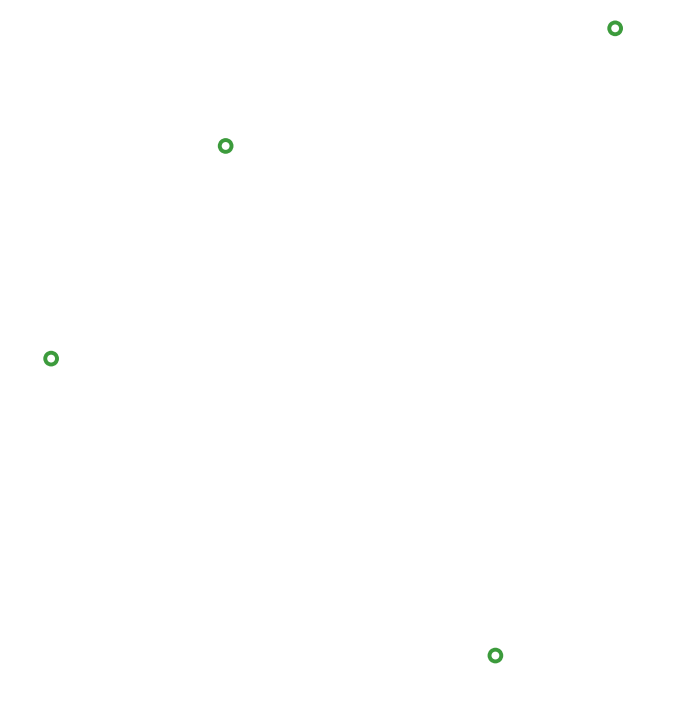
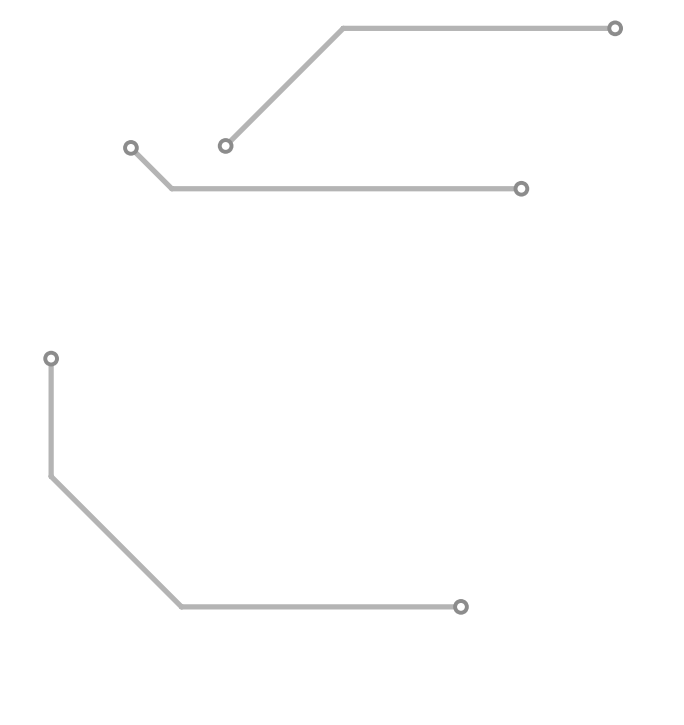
track: none -> (615, 28) (343, 28) (225, 145)
track: none -> (130, 147) (171, 188) (521, 188)
via: none -> (130, 147)
via: none -> (521, 188)
track: none -> (51, 358) (51, 476) (181, 606) (460, 606)
via position: (495, 655) -> (460, 606)

